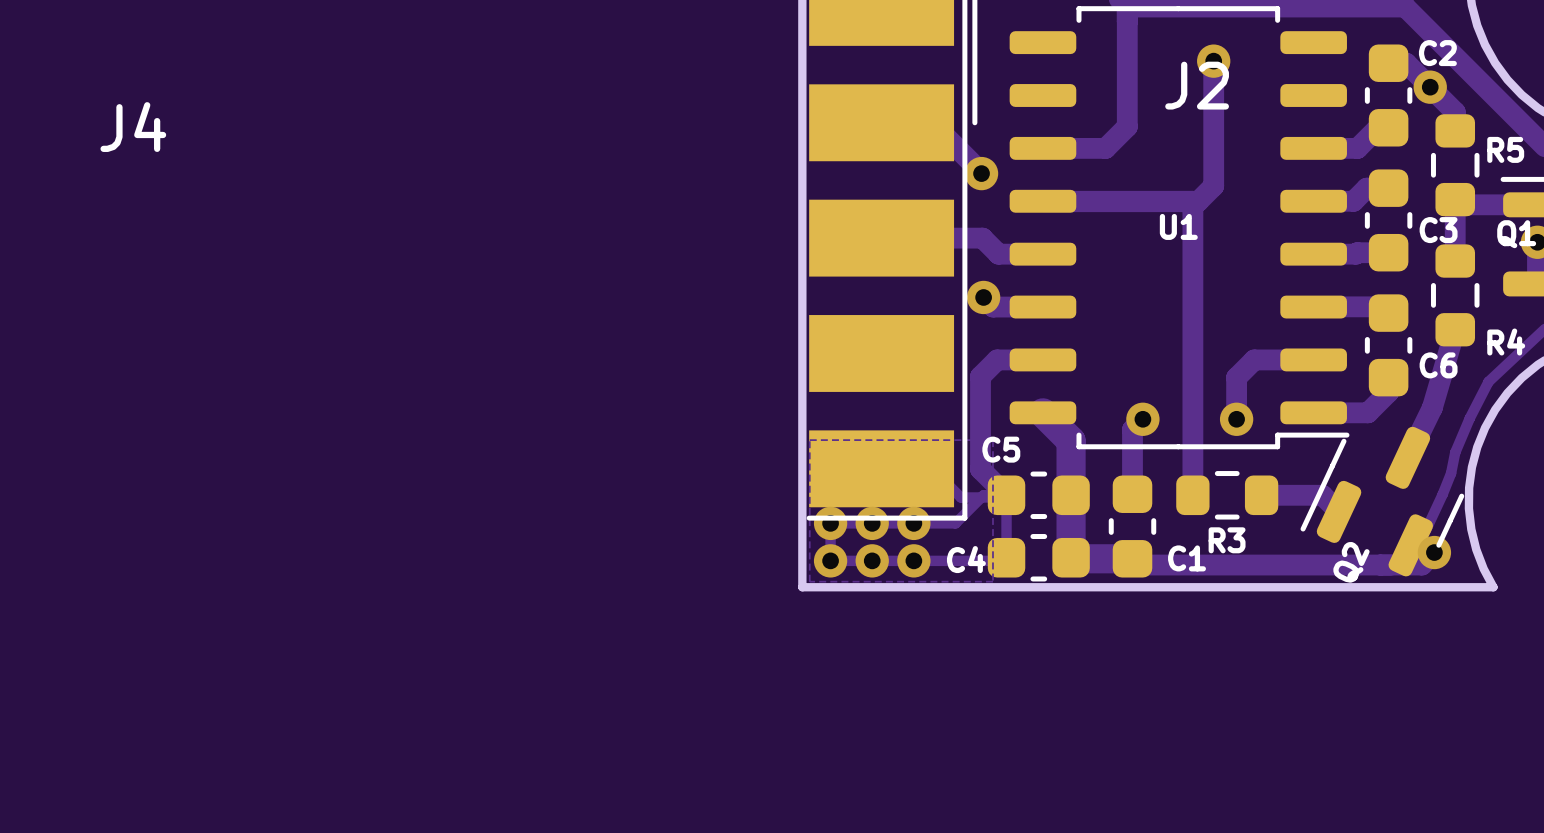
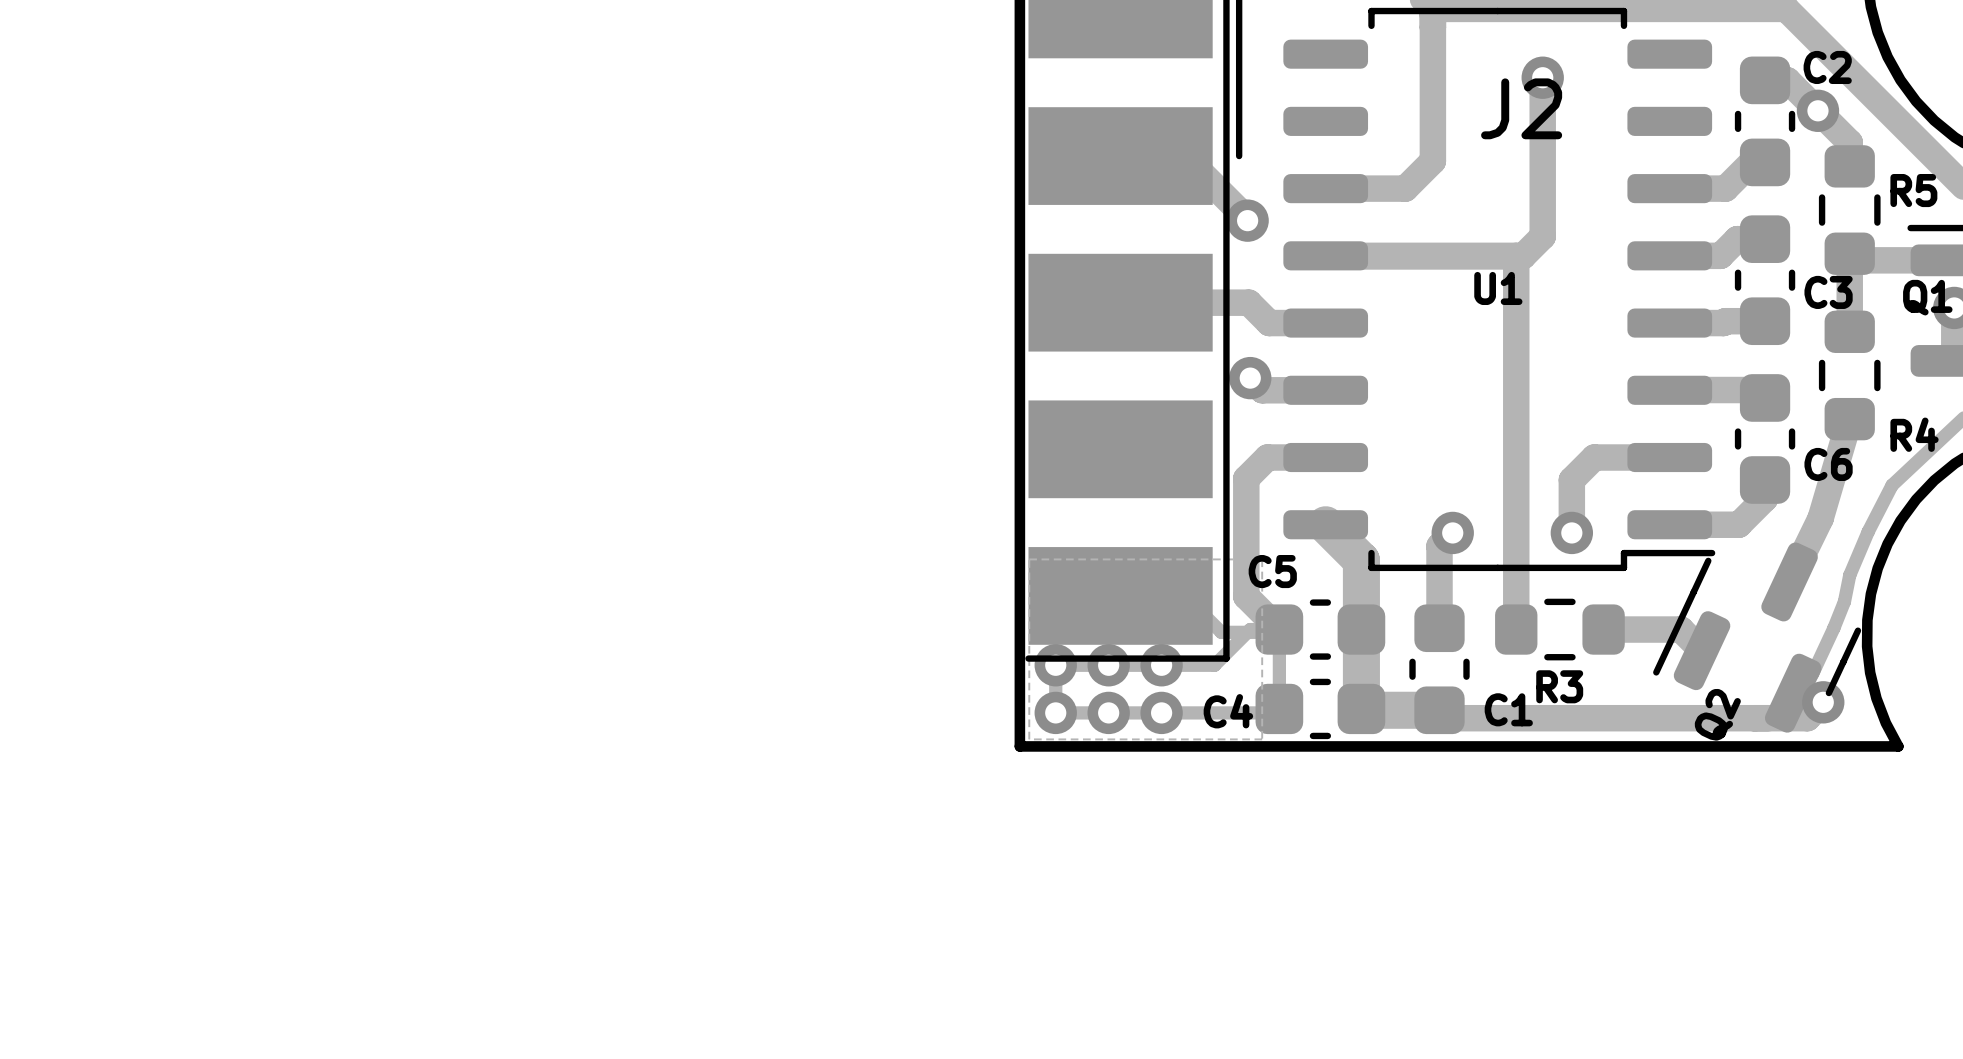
J4: (133, 127) -> none

